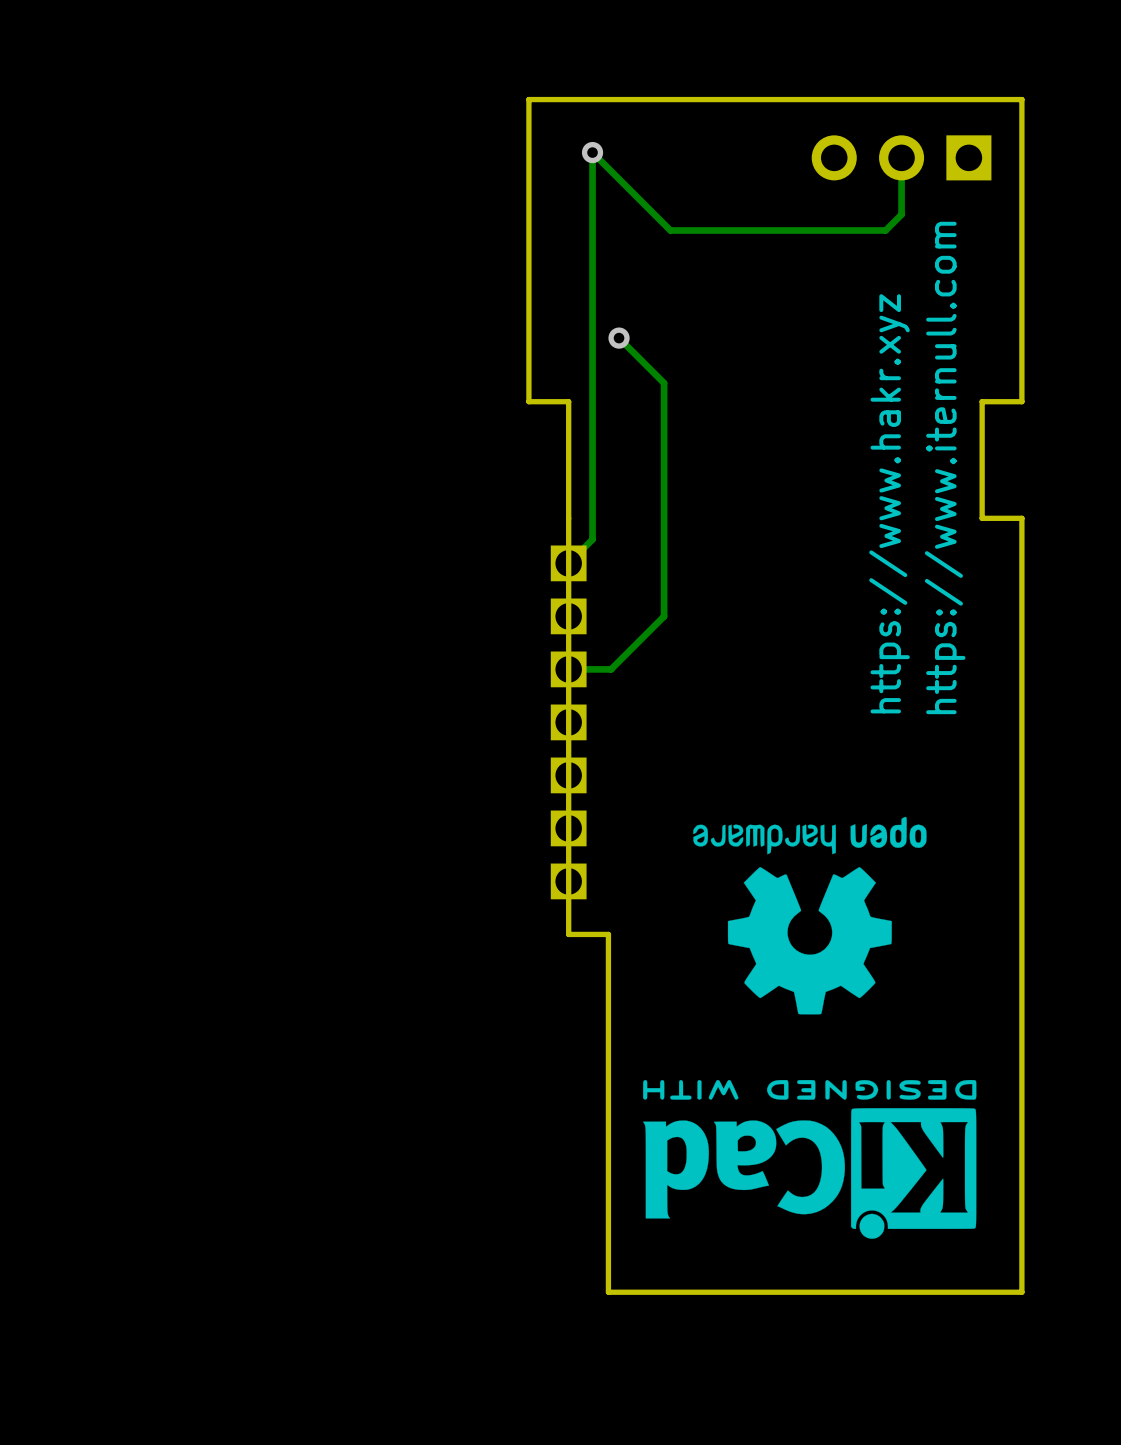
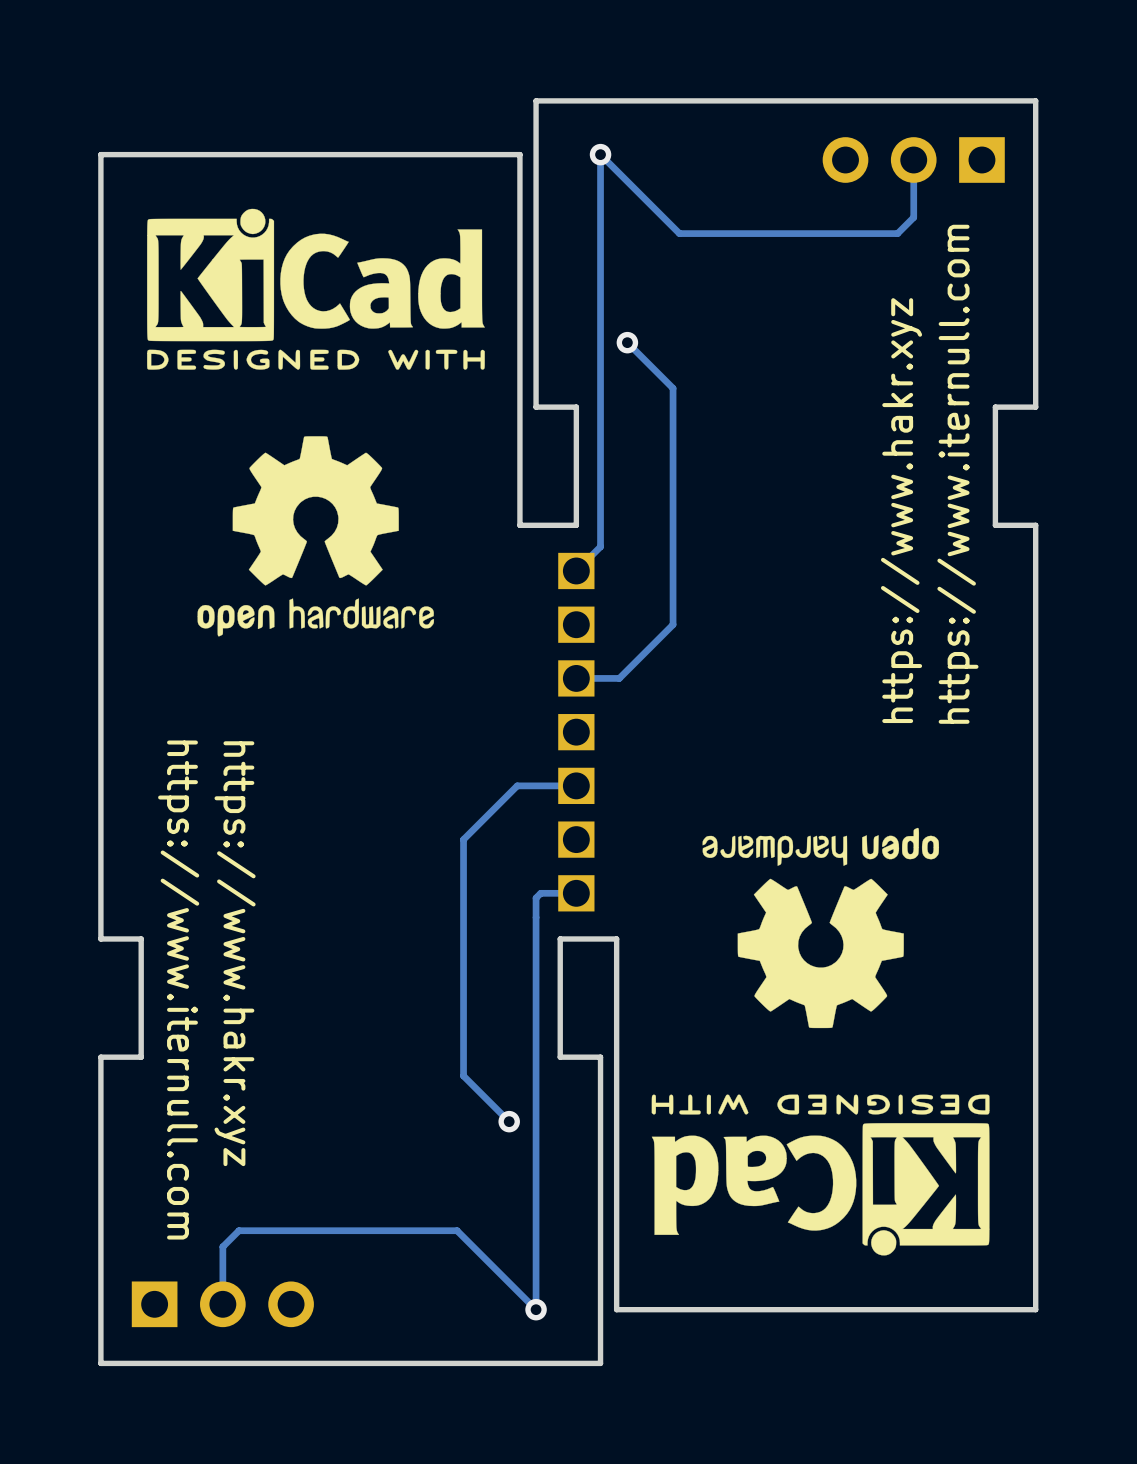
drawing: none -> [147, 208, 485, 370]
drawing: none -> [197, 436, 435, 637]
board edge: (568, 518) (568, 934) (608, 934) -> (576, 525) (519, 525) (519, 154) (100, 154) (100, 938) (141, 938) (141, 1057) (100, 1057) (100, 1363) (600, 1363) (600, 1057) (560, 1057) (560, 938) (616, 938) (616, 947)
track: none -> (565, 785) (517, 785) (463, 839) (463, 1075) (509, 1121)
track: none -> (565, 893) (540, 893) (536, 898) (536, 1309) (457, 1230) (238, 1230) (222, 1246) (222, 1304)
text: none -> https://www.hakr.xyz (235, 953)
text: none -> https://www.iternull.com (178, 990)
via: none -> (509, 1121)
part: none -> (222, 1304)
via: none -> (536, 1309)

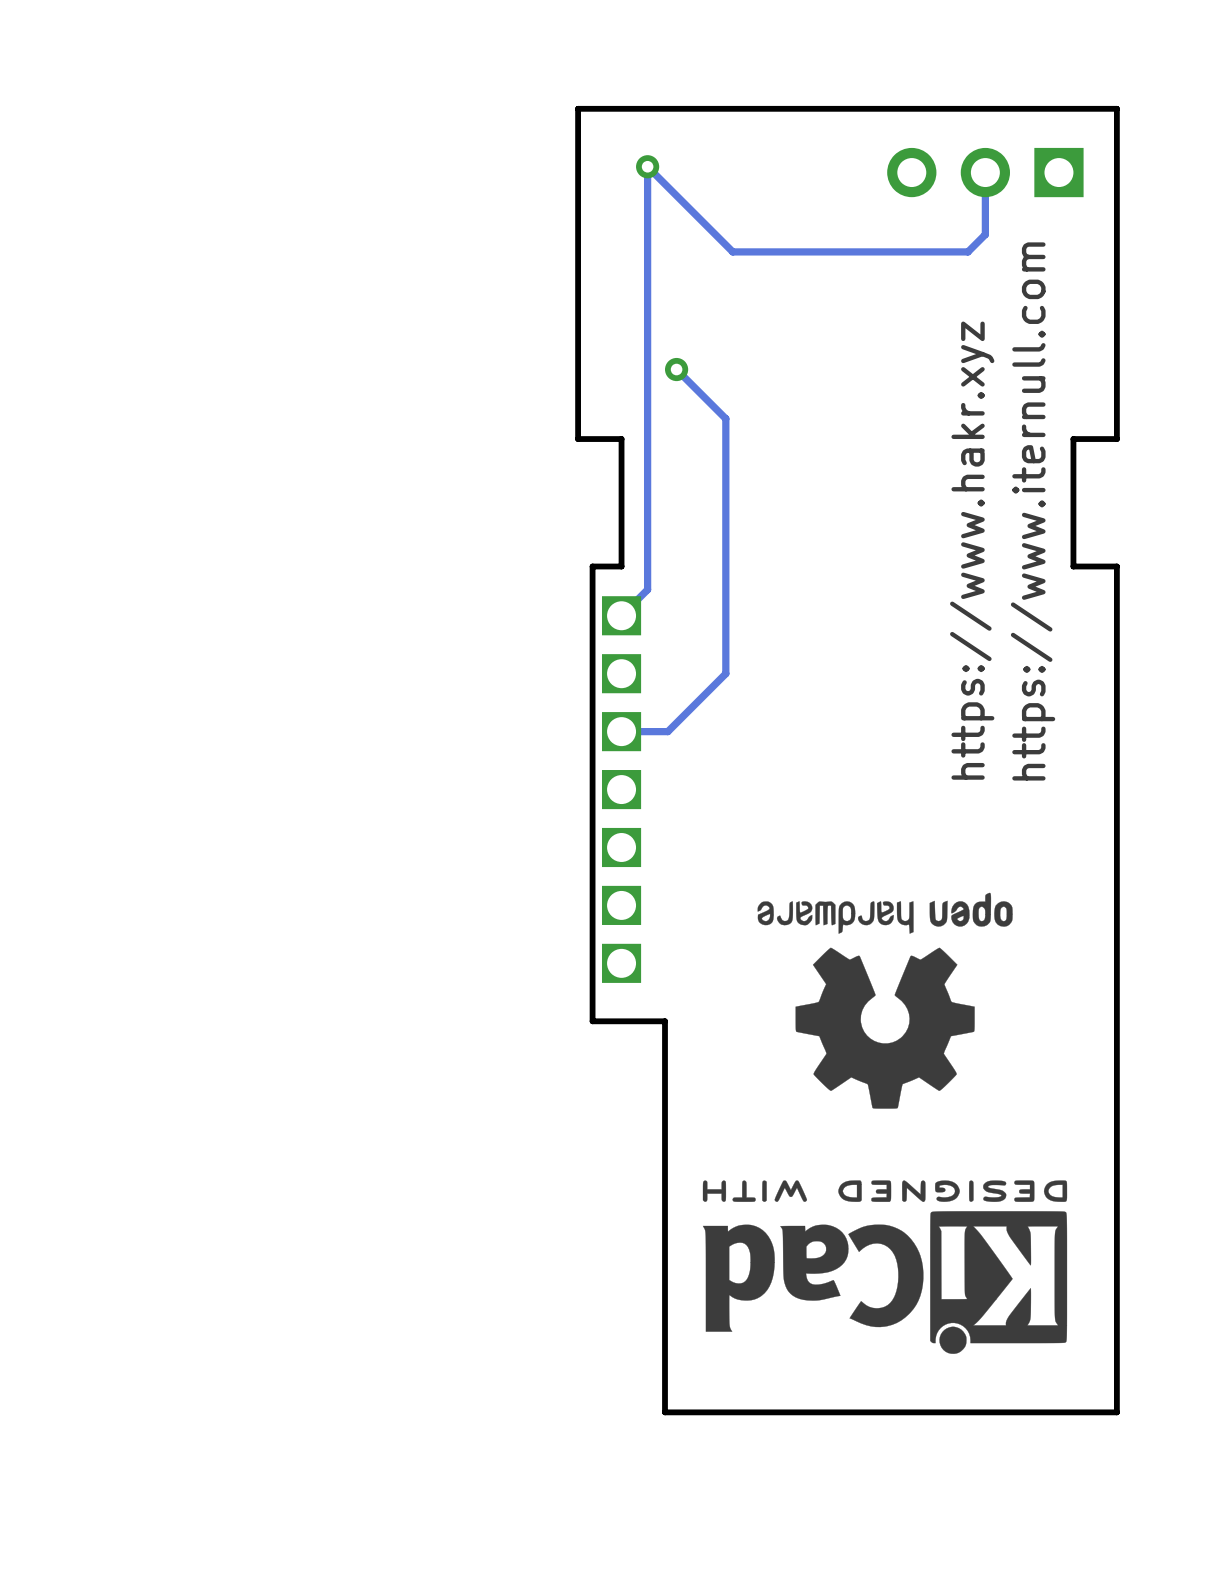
drawing: [147, 208, 485, 370] -> none
drawing: [197, 436, 435, 637] -> none
board edge: (549, 525) (519, 525) (519, 154) (100, 154) (100, 938) (141, 938) (141, 1057) (100, 1057) (100, 1363) (600, 1363) (600, 1057) (560, 1057) (560, 938) (616, 938) (616, 947) -> (592, 566) (592, 1021) (664, 1021)
track: (565, 785) (517, 785) (463, 839) (463, 1075) (509, 1121) -> none
track: (565, 893) (540, 893) (536, 898) (536, 1309) (457, 1230) (238, 1230) (222, 1246) (222, 1304) -> none
text: https://www.hakr.xyz (235, 953) -> none
text: https://www.iternull.com (178, 990) -> none
via: (509, 1121) -> none
part: (222, 1304) -> none
via: (536, 1309) -> none

